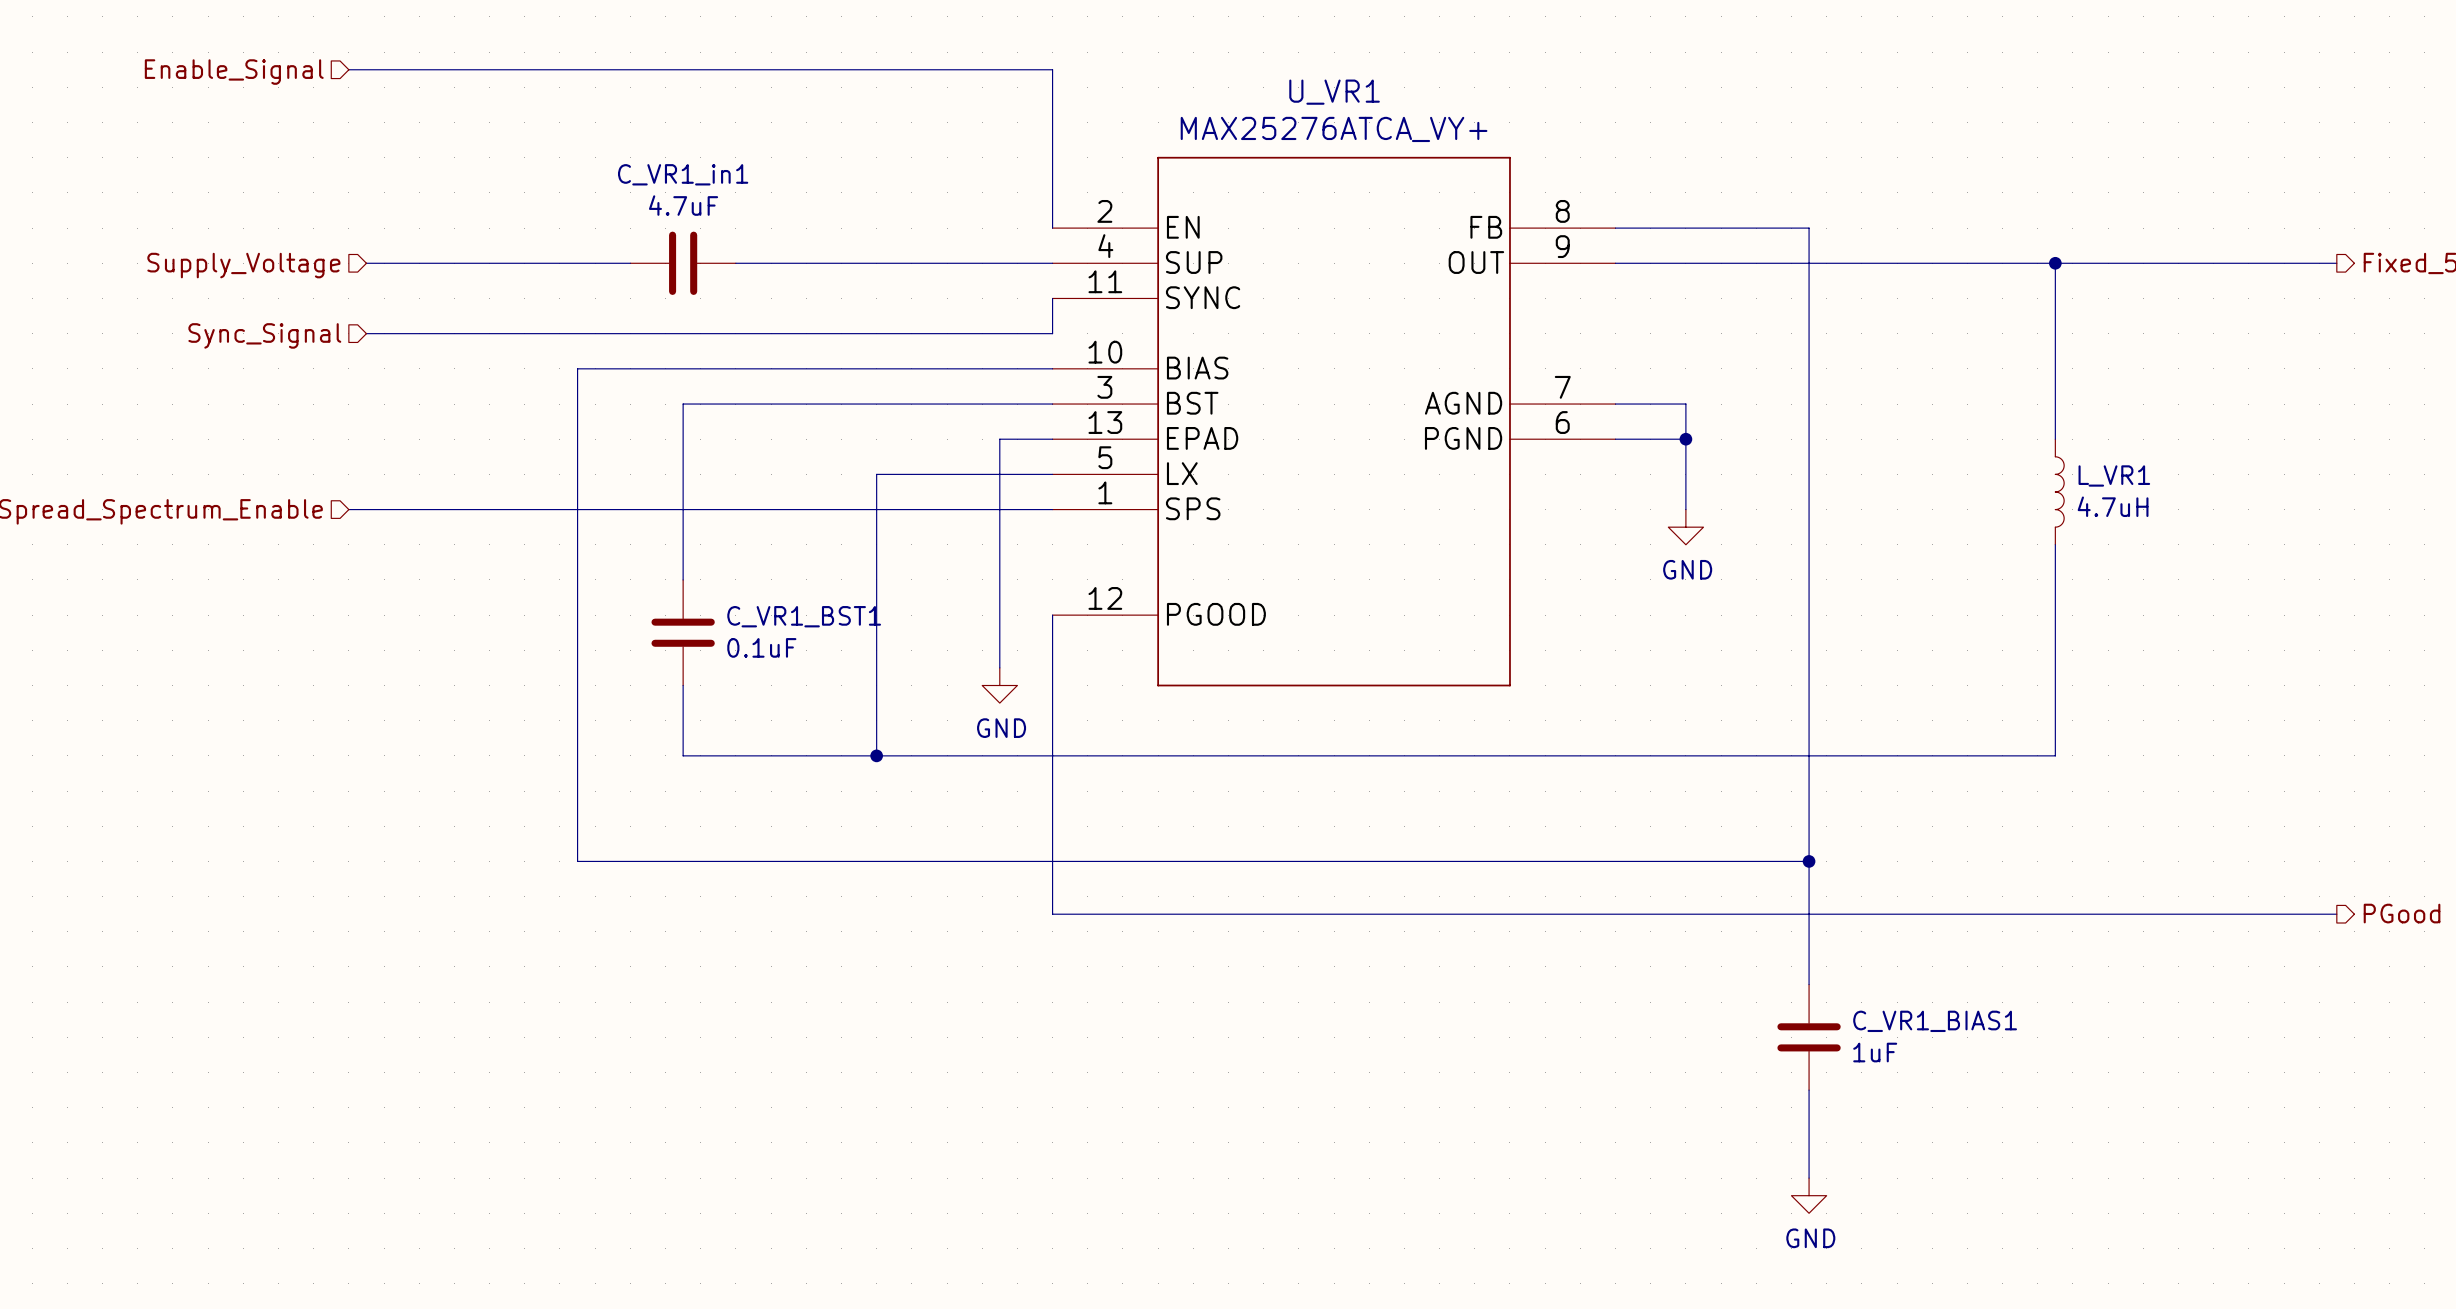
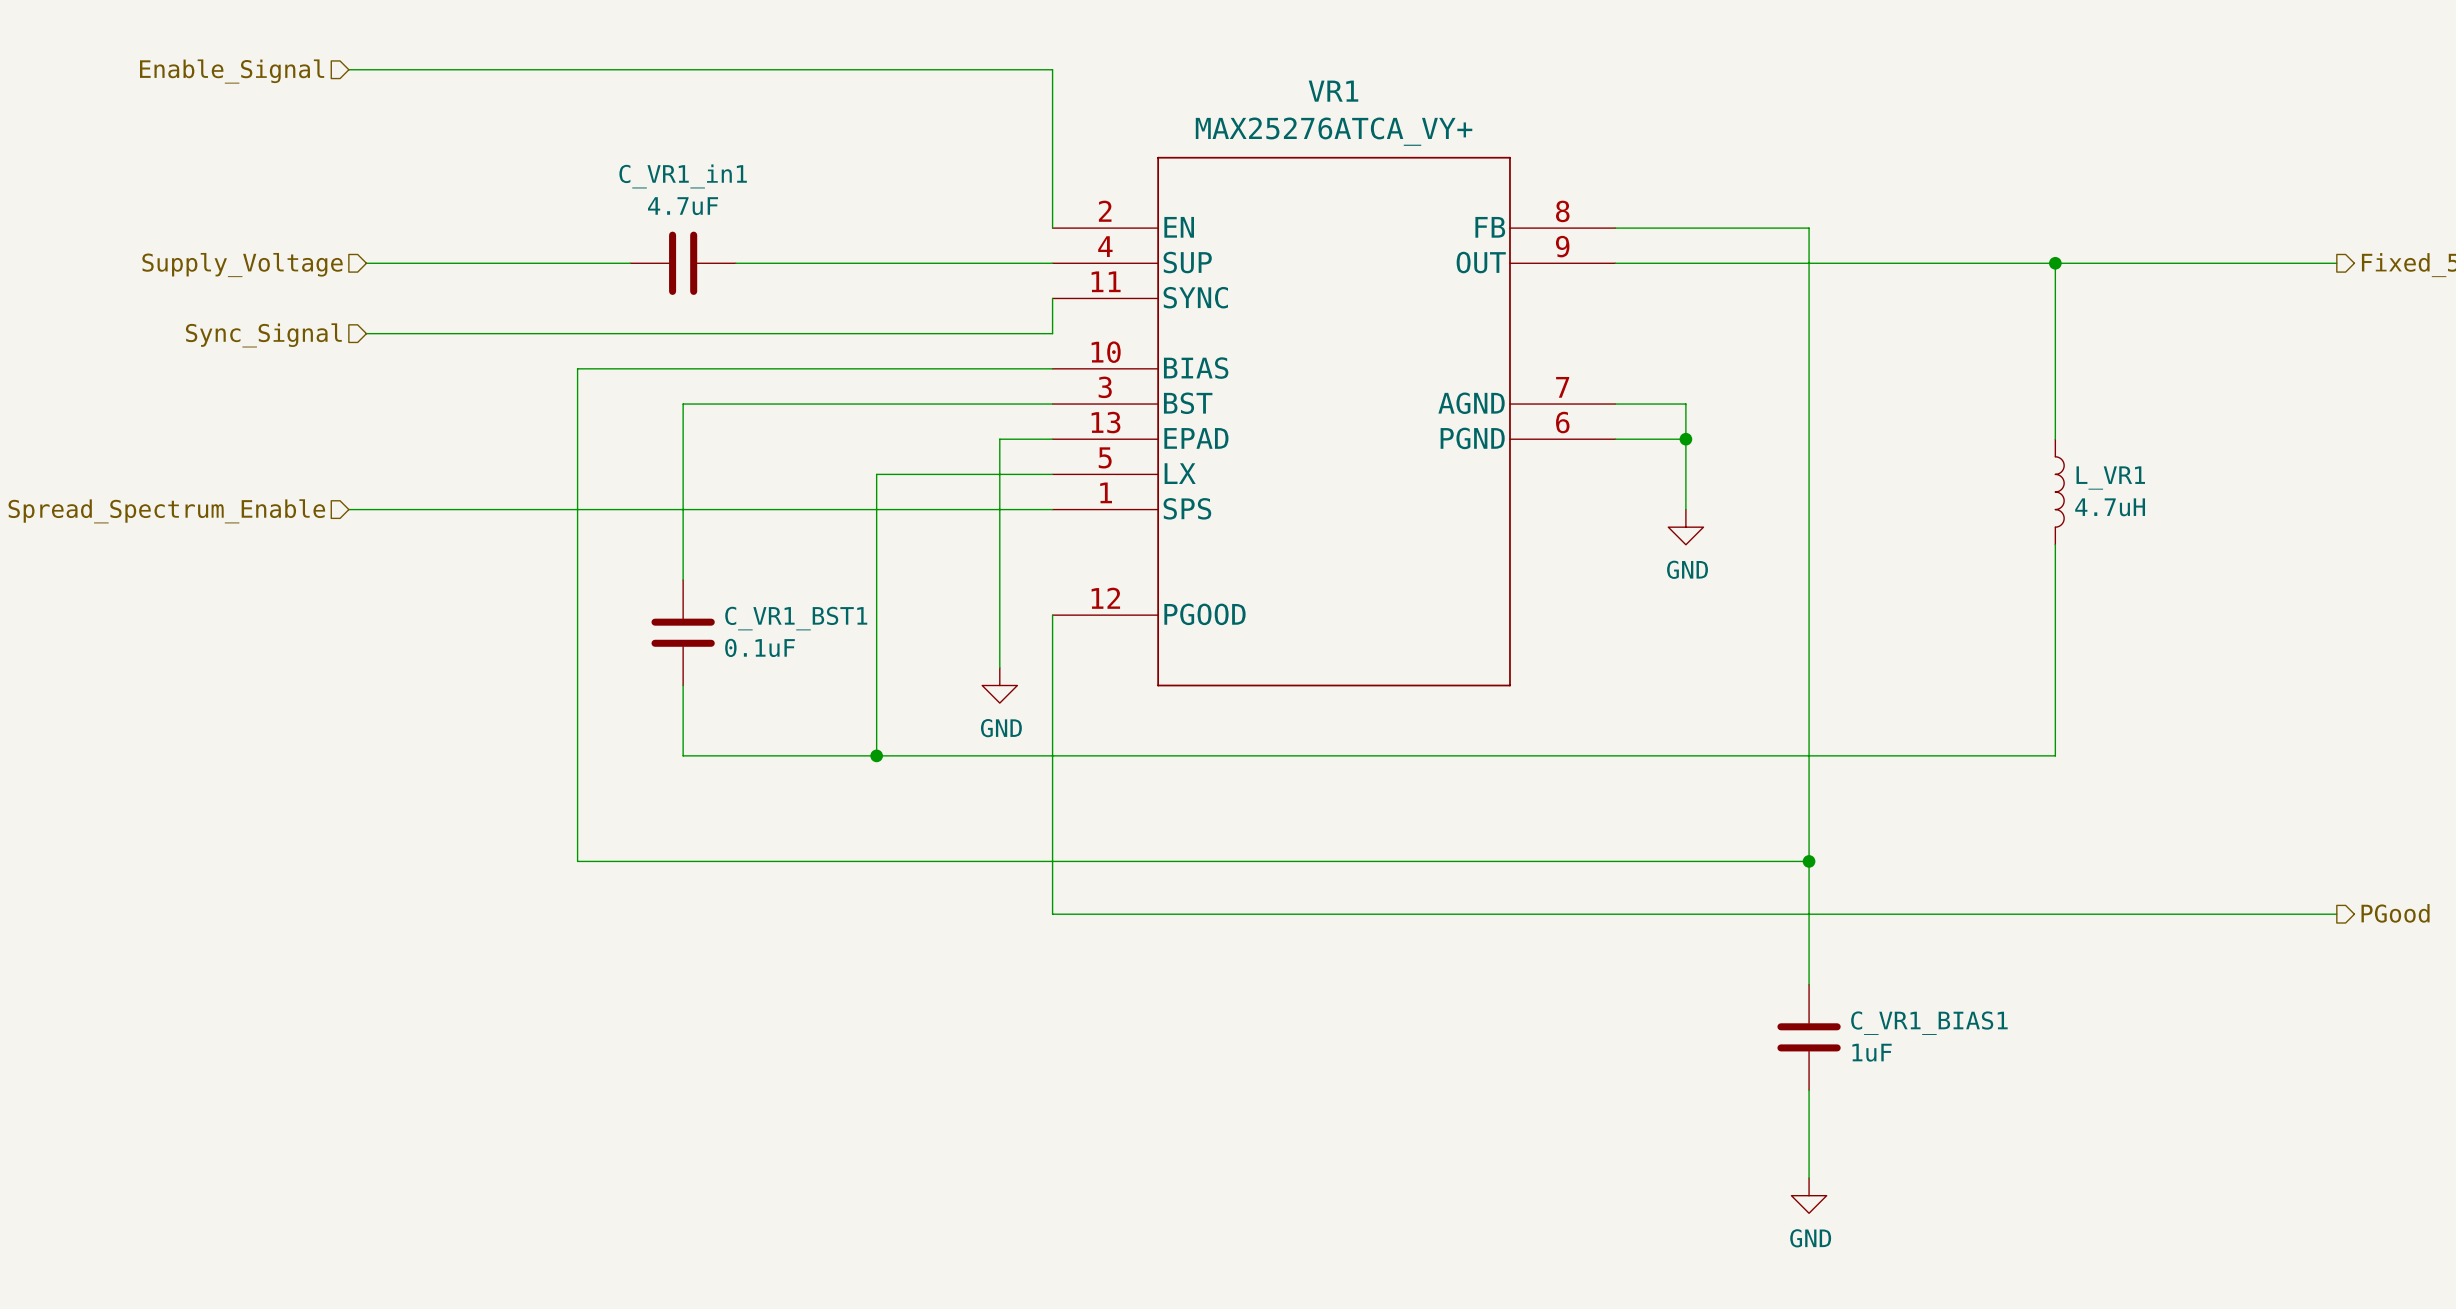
U_VR1 name: U_VR1 (1334, 92) -> VR1 (1333, 91)

